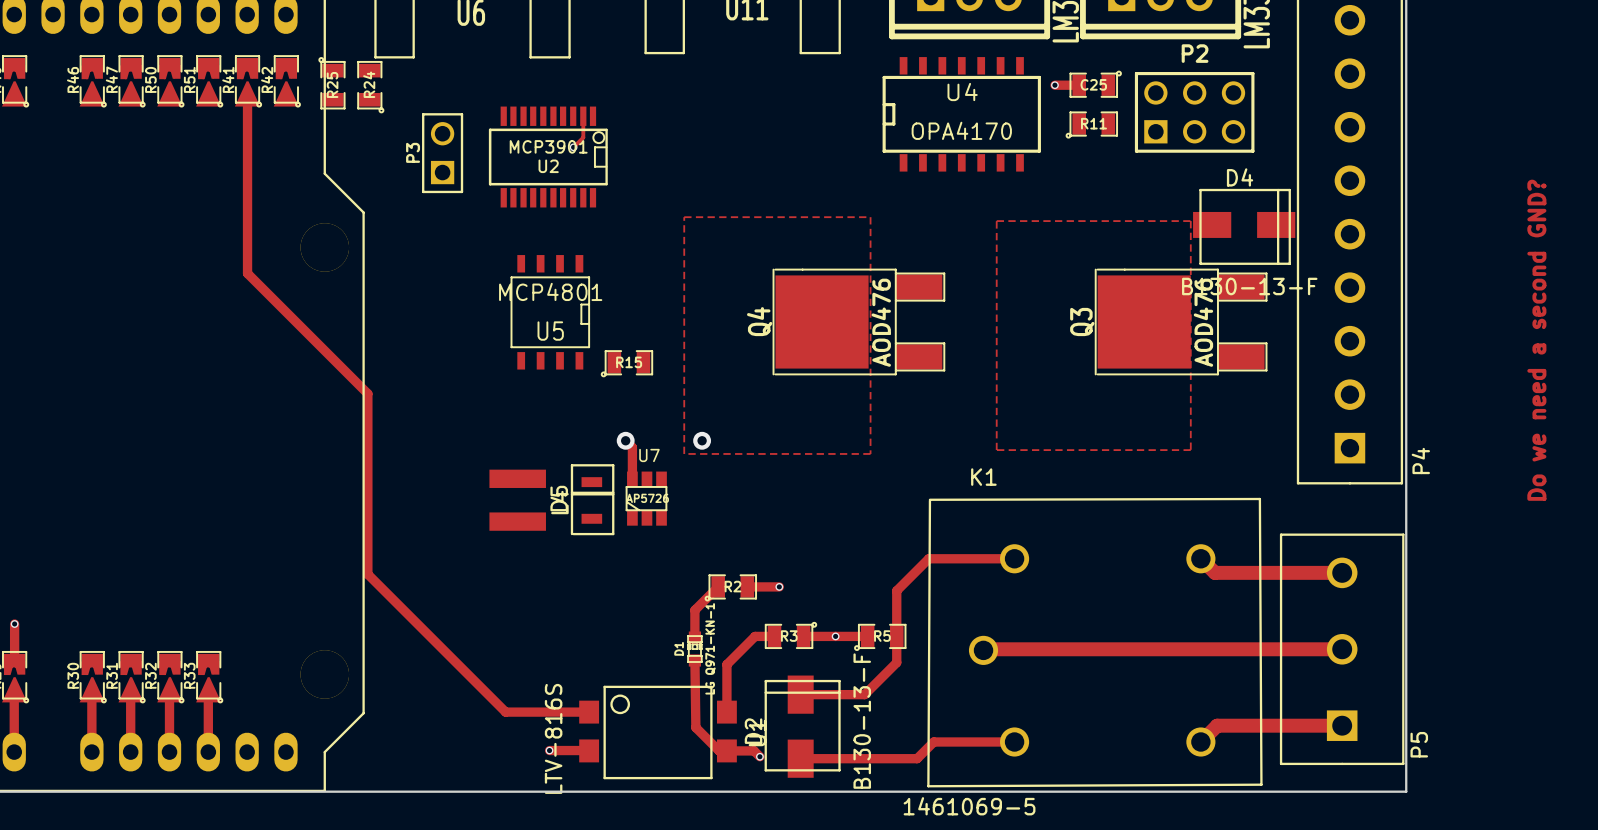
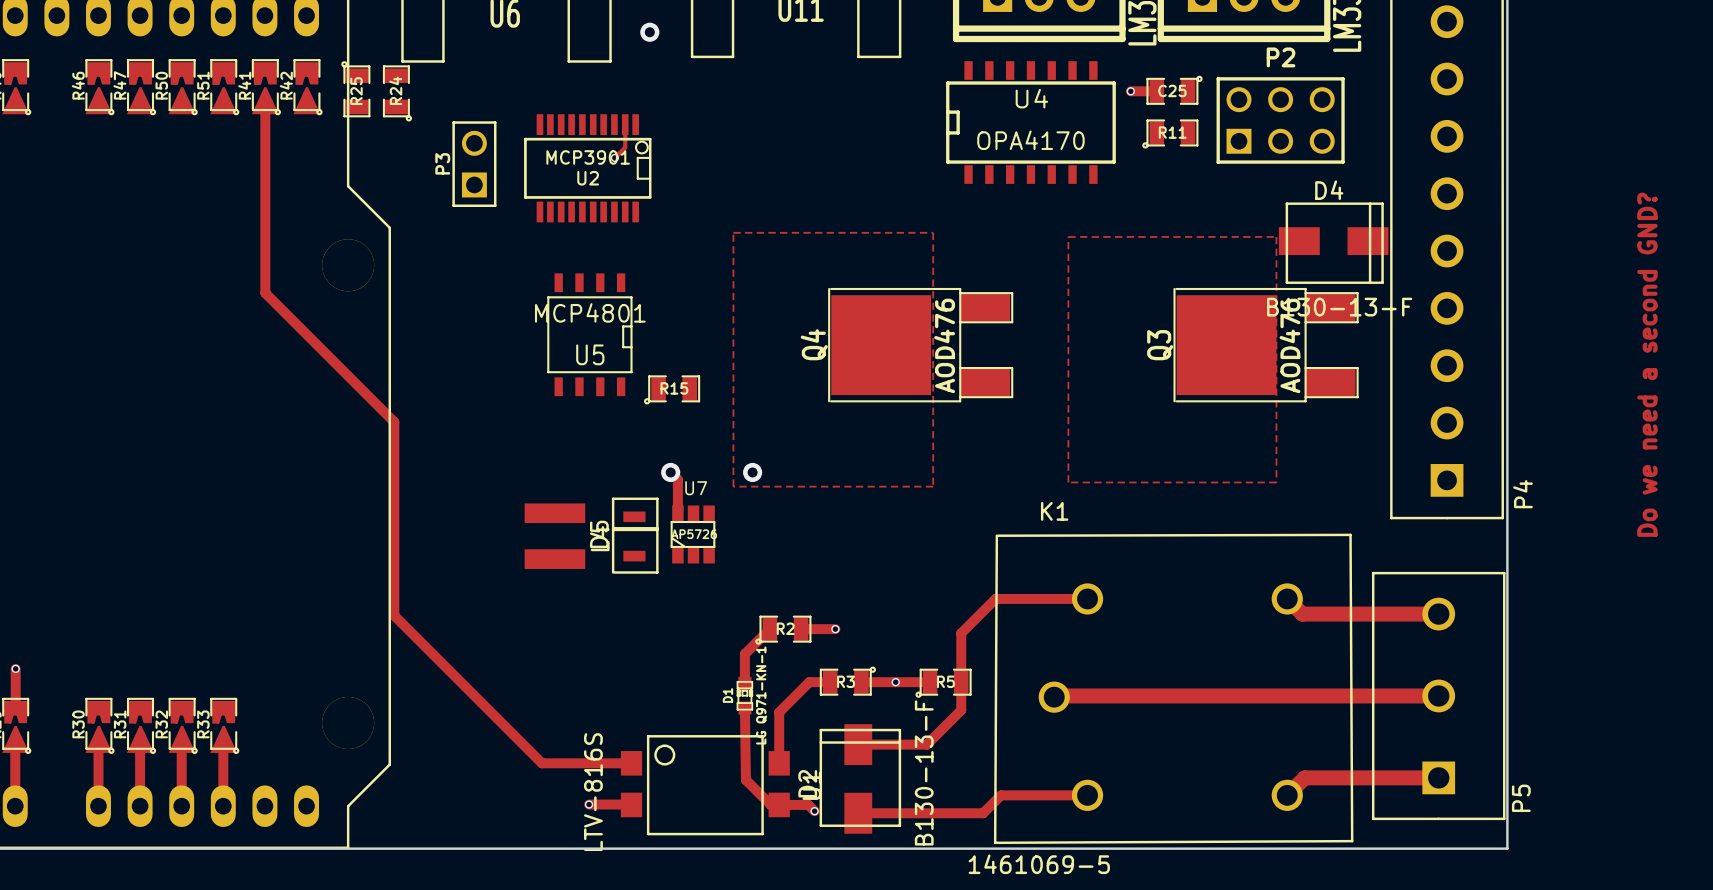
via: none -> (649, 32)

